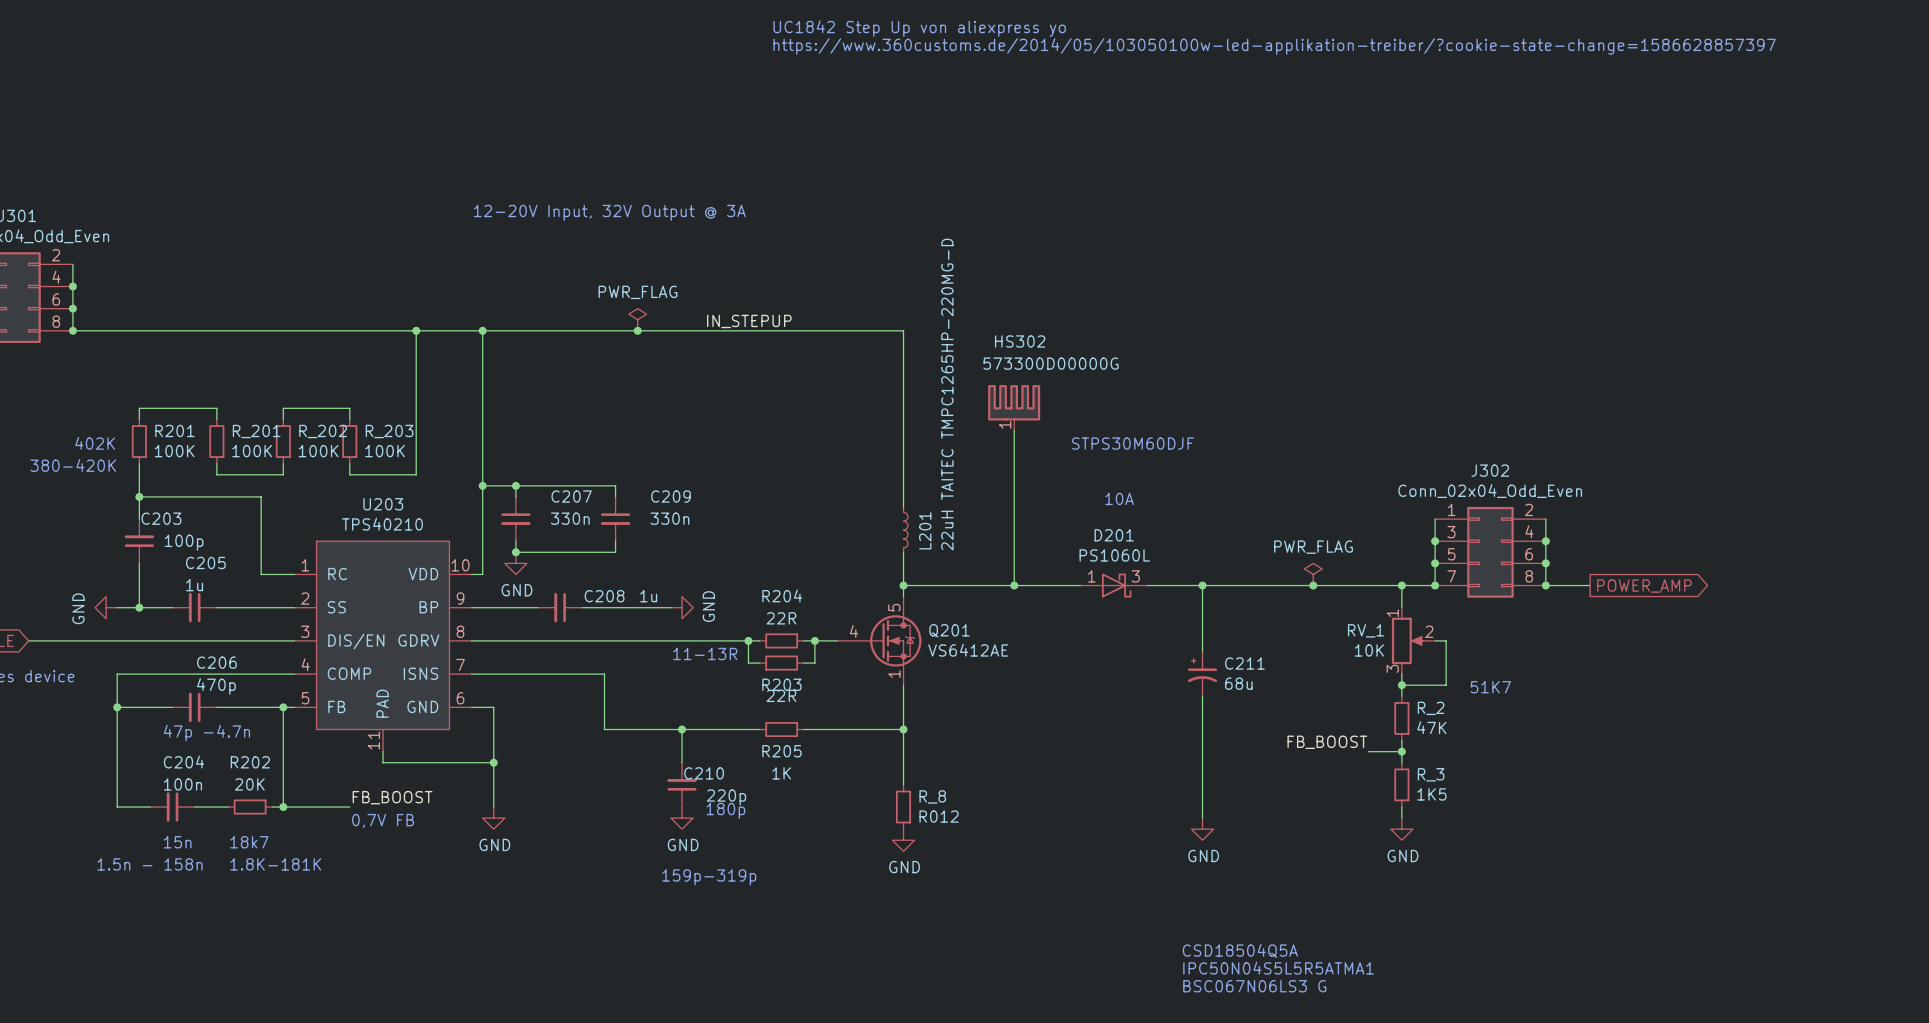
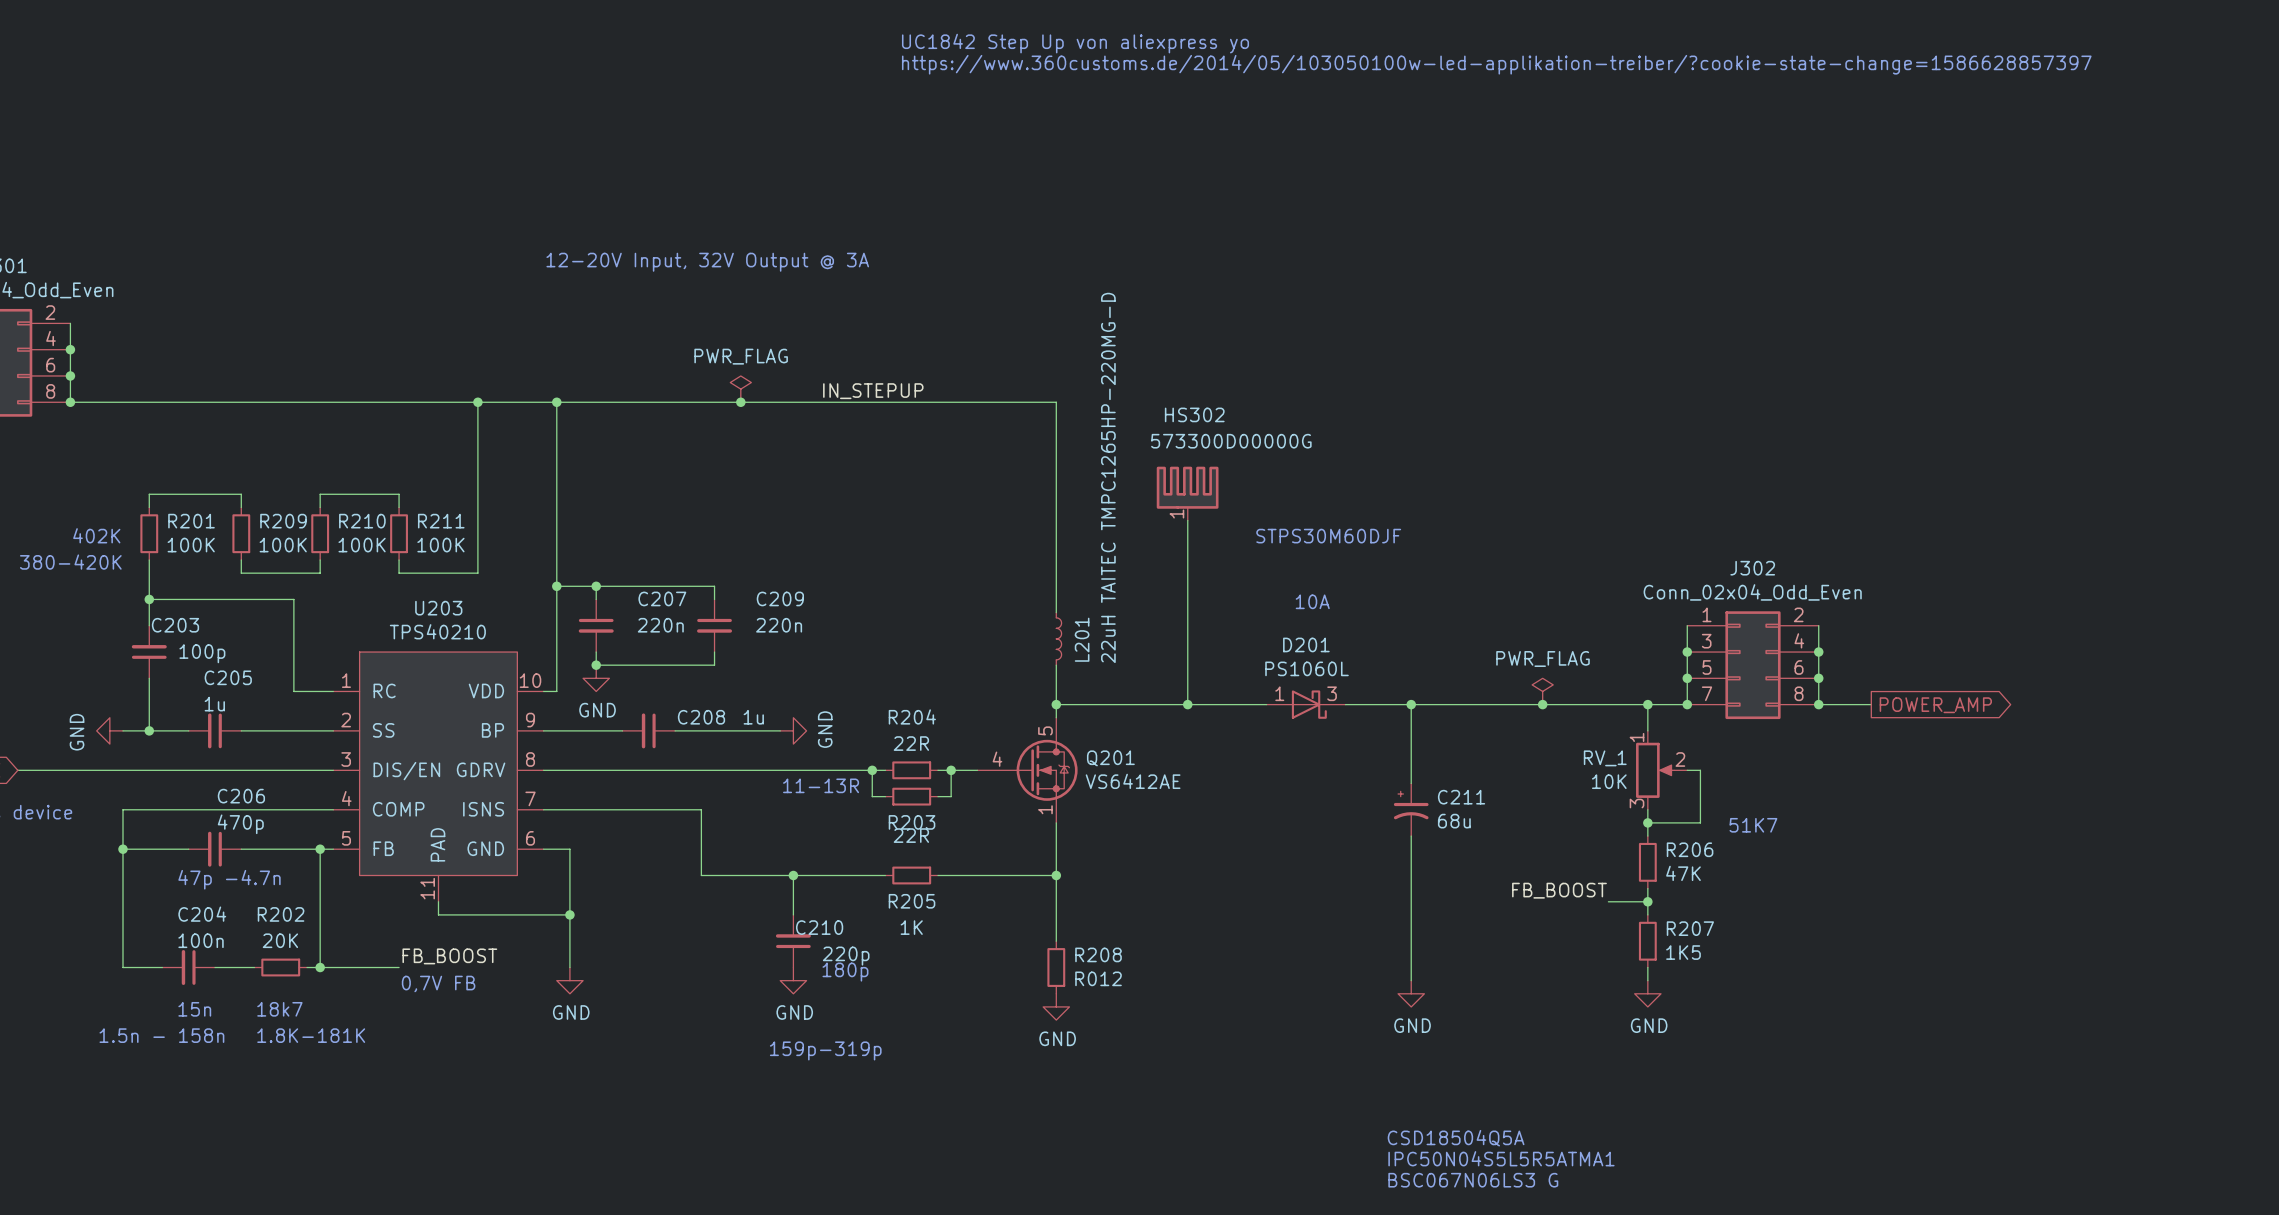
R_201 name: R_201 (256, 431) -> R209 (283, 521)
R_202 name: R_202 (323, 431) -> R210 (362, 521)
R_203 name: R_203 (389, 431) -> R211 (441, 521)
C207 value: 330n (570, 518) -> 220n (660, 625)
C209 value: 330n (669, 518) -> 220n (779, 625)
R_2 name: R_2 (1431, 708) -> R206 (1690, 849)
R_3 name: R_3 (1431, 774) -> R207 (1690, 928)
R_8 name: R_8 (932, 796) -> R208 (1098, 954)

